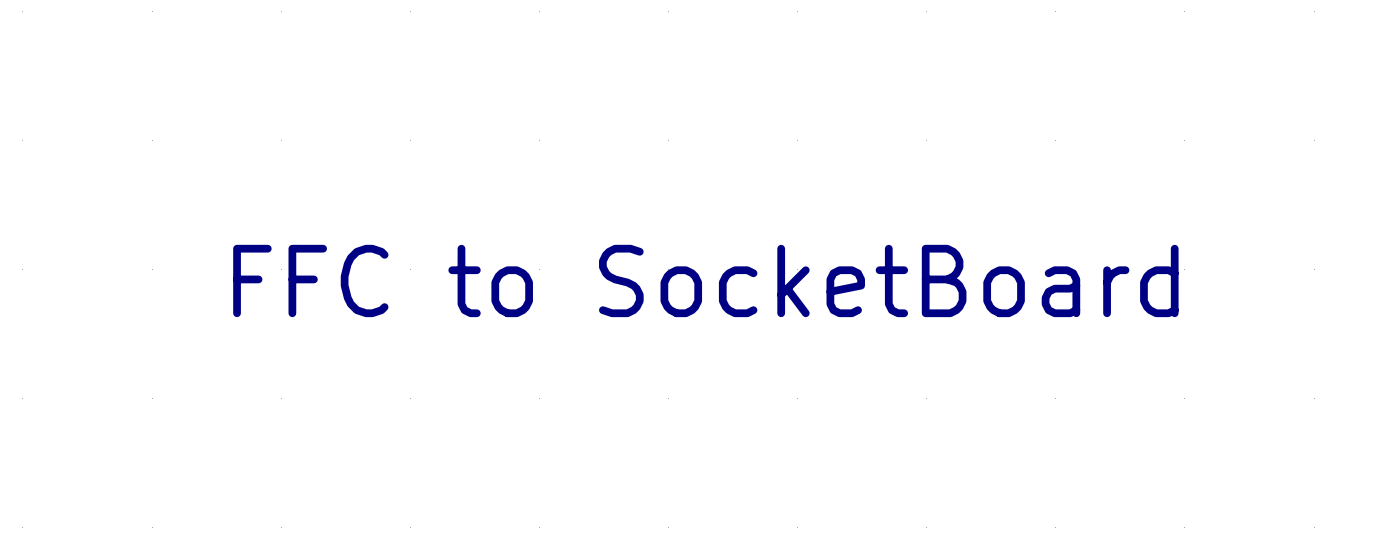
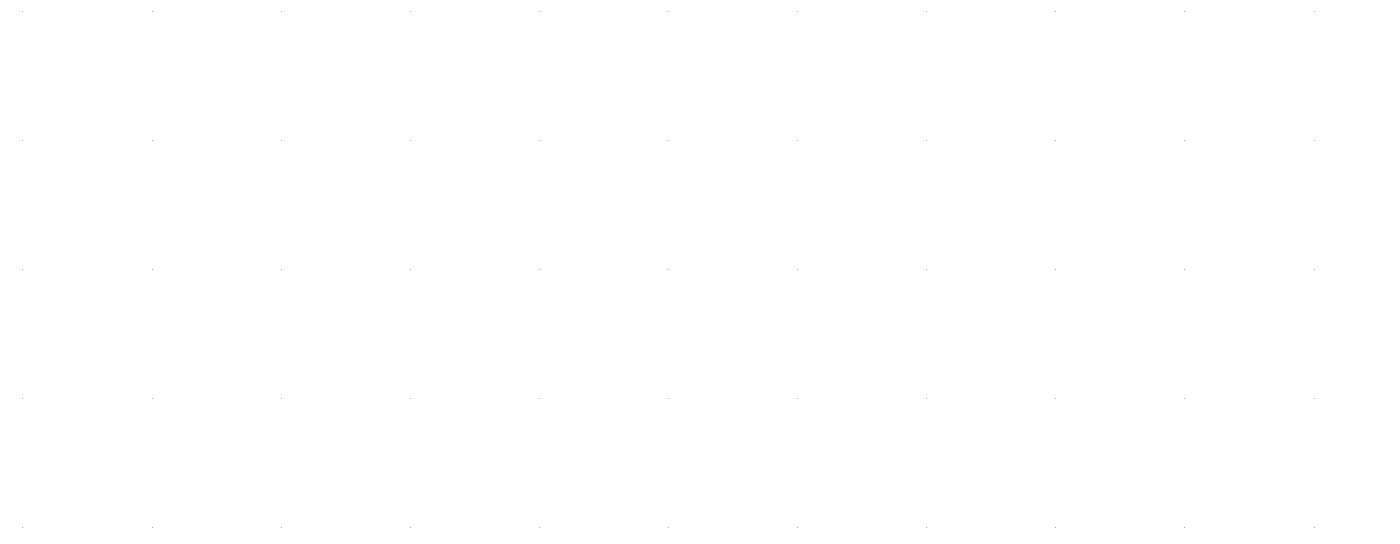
text: FFC to SocketBoard (705, 280) -> none

